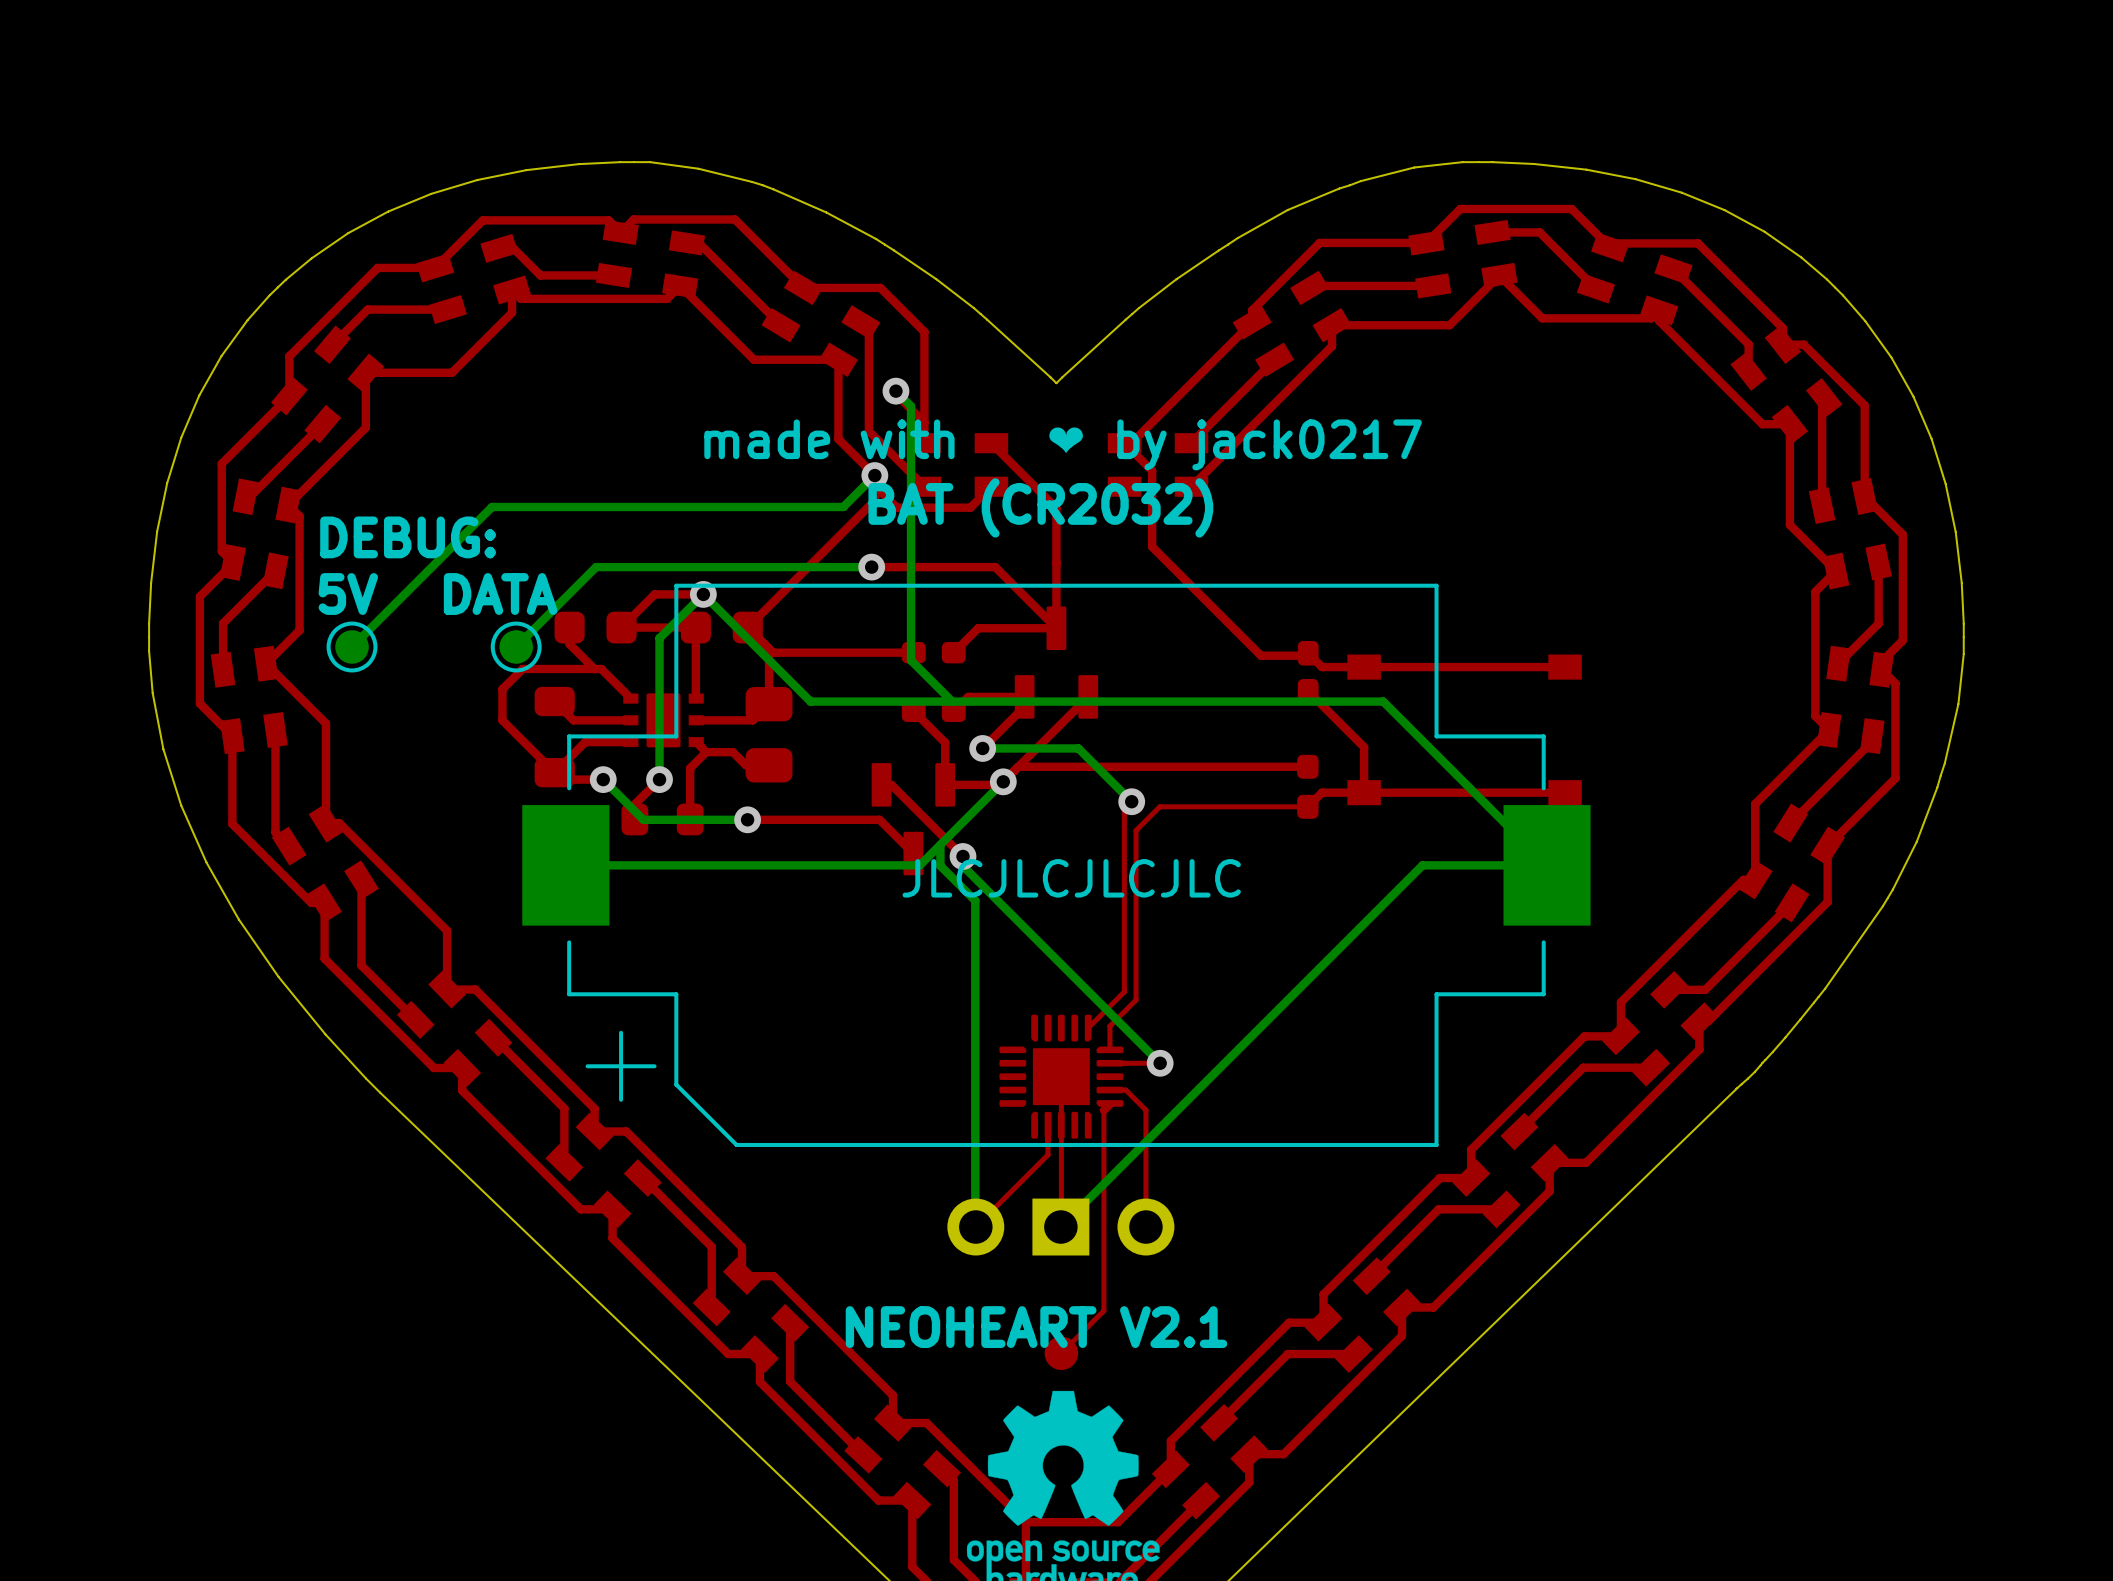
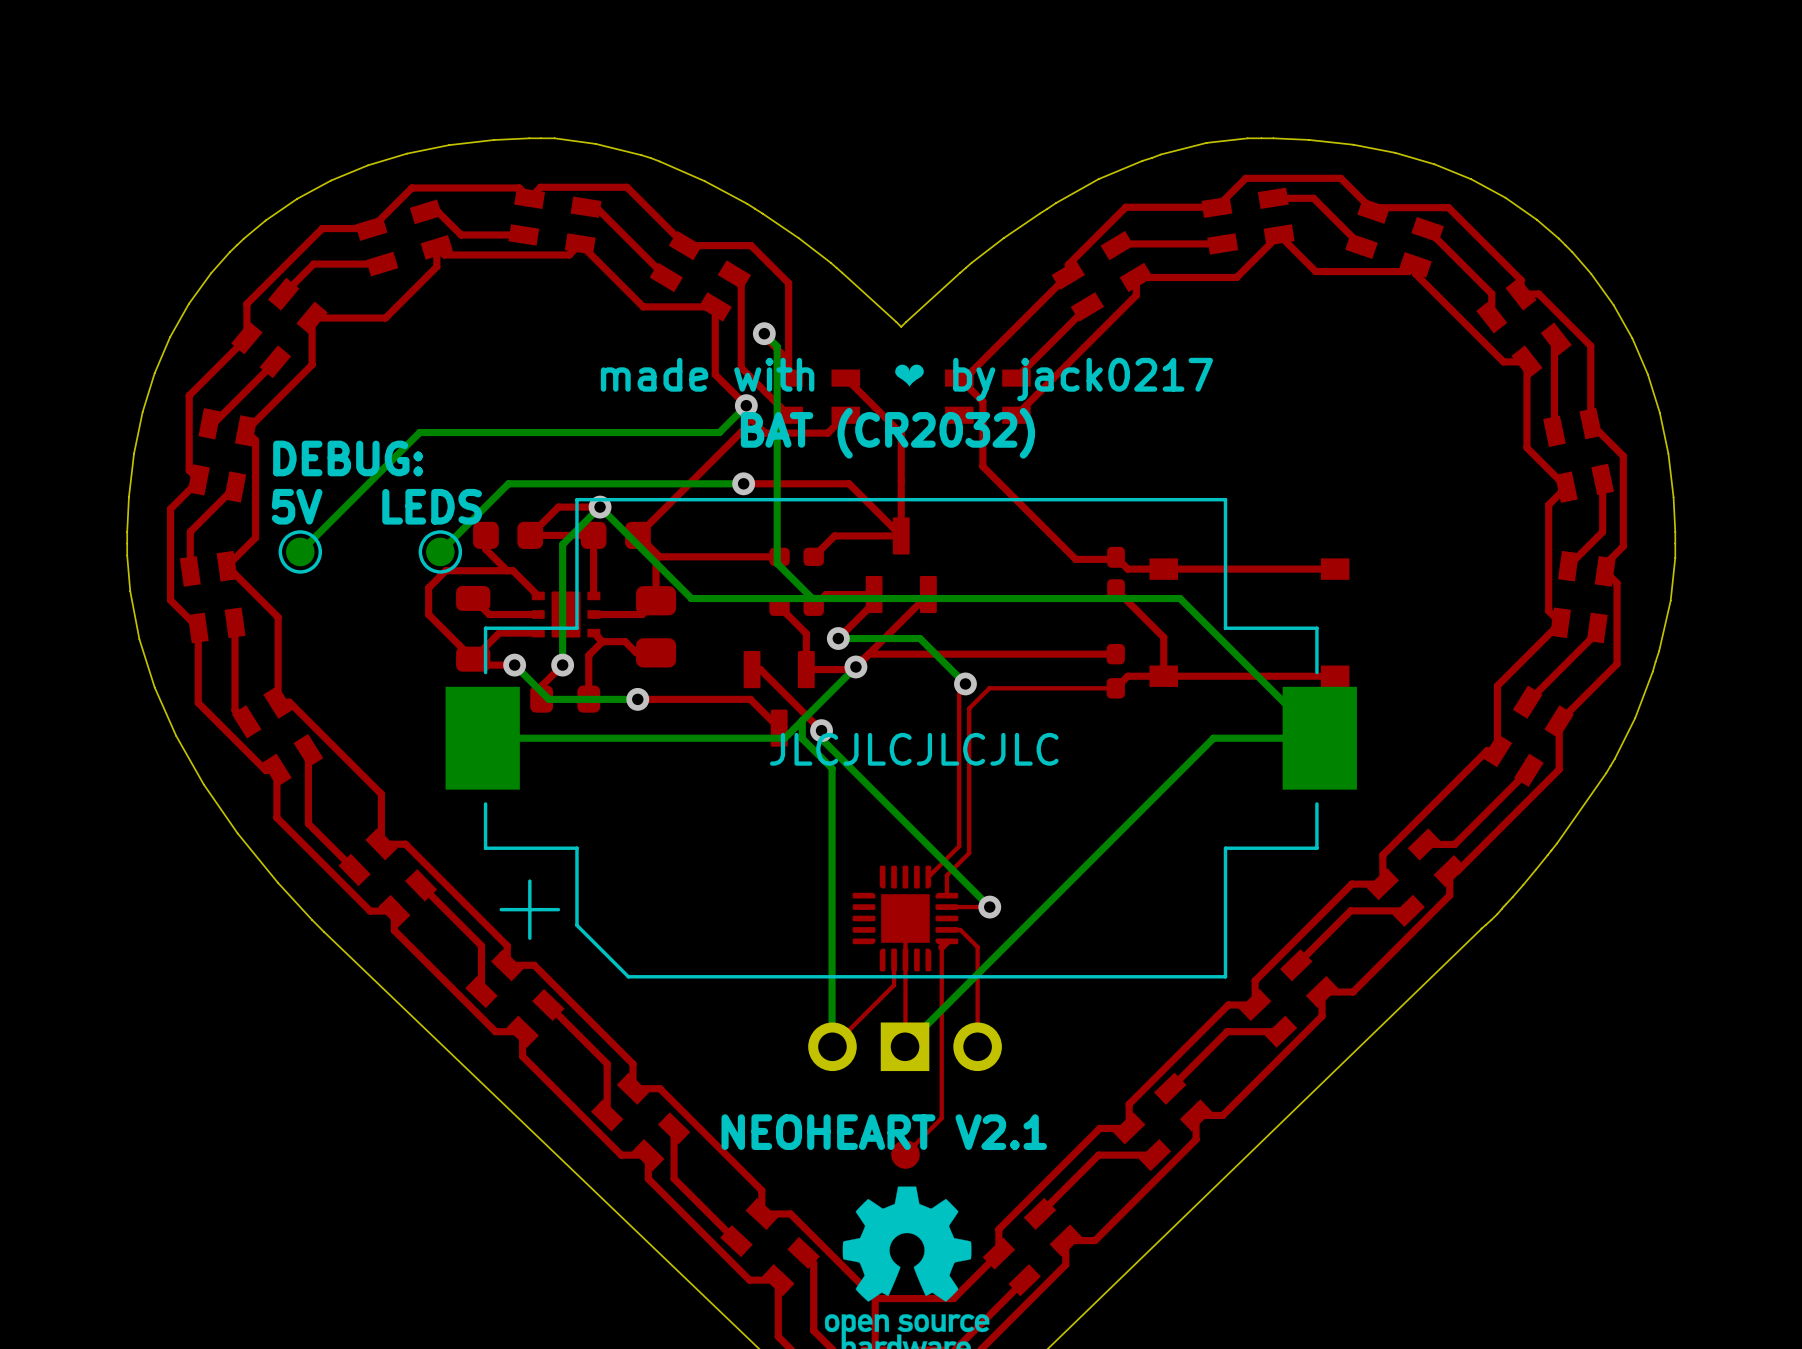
text: DATA (500, 594) -> LEDS (432, 506)

